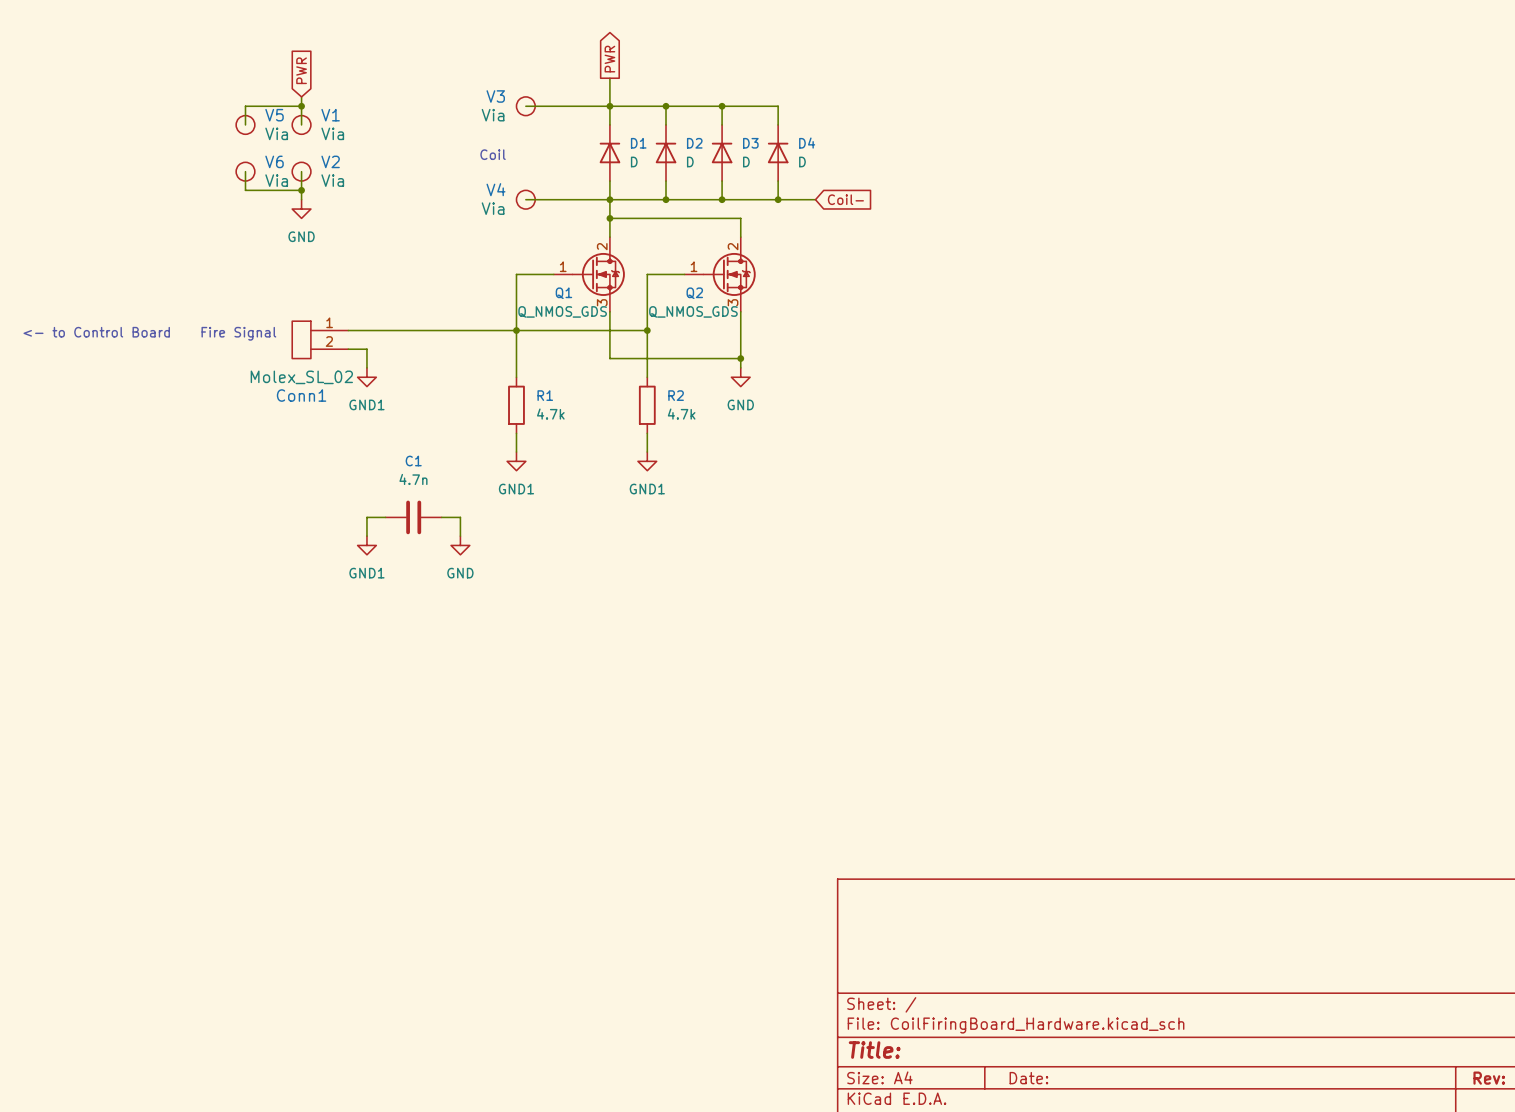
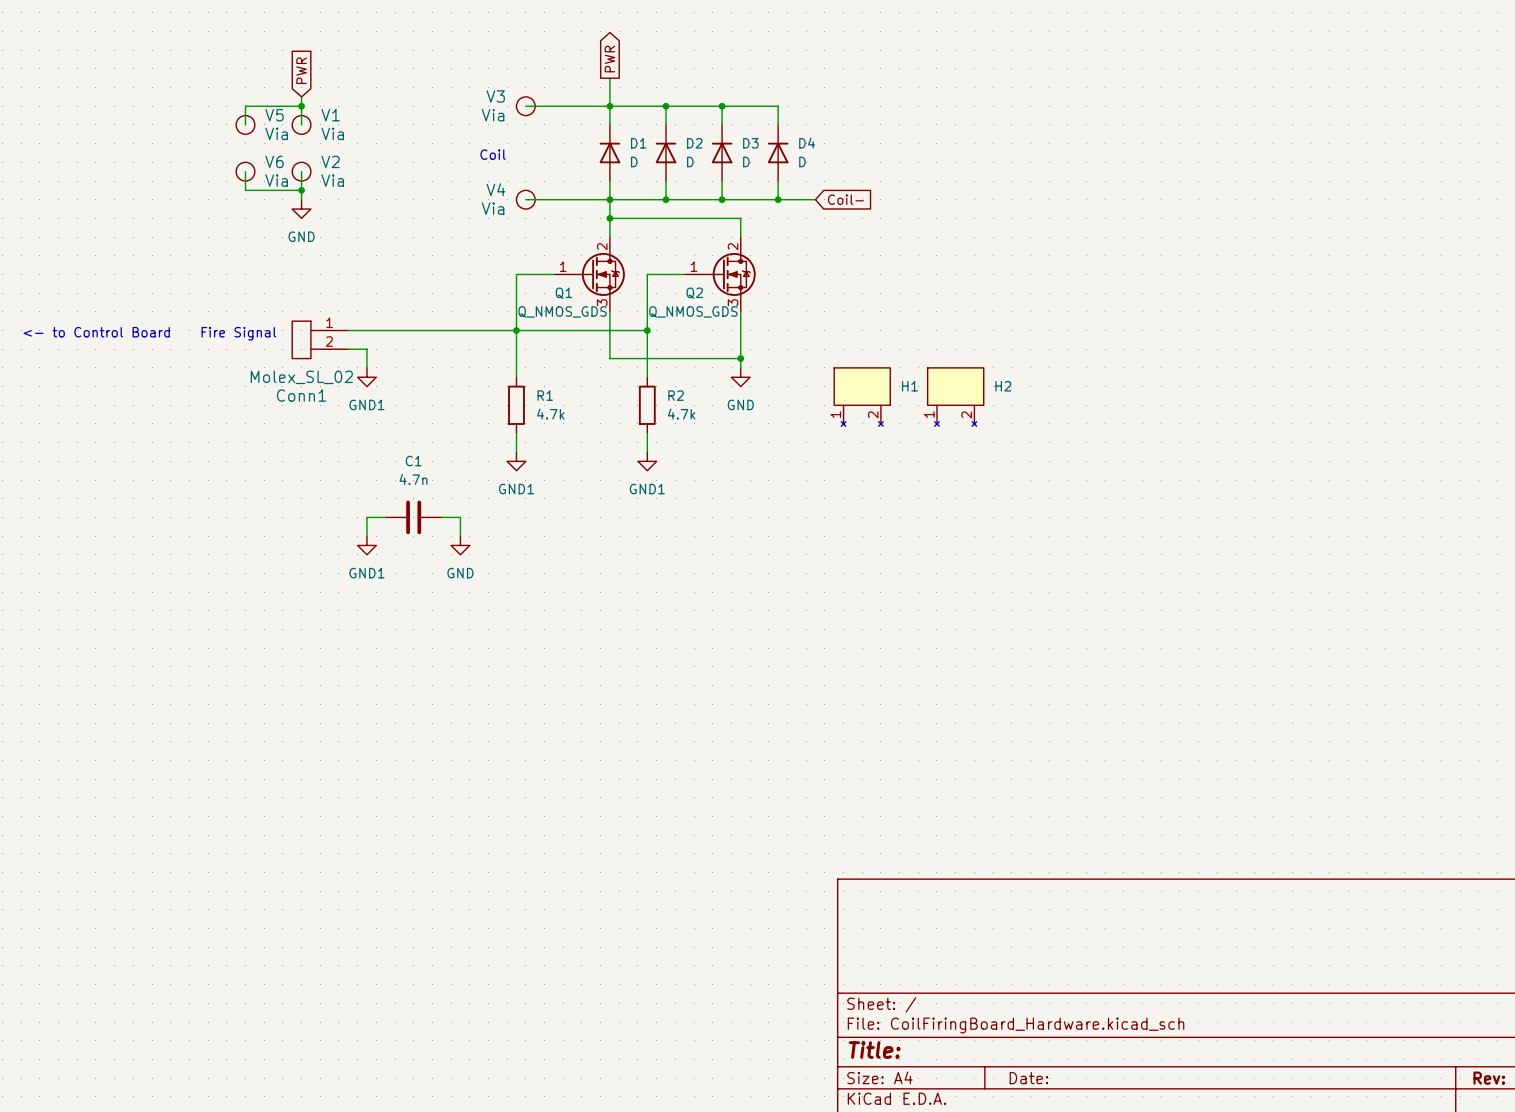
H1: none -> (862, 397)
H2: none -> (955, 397)

